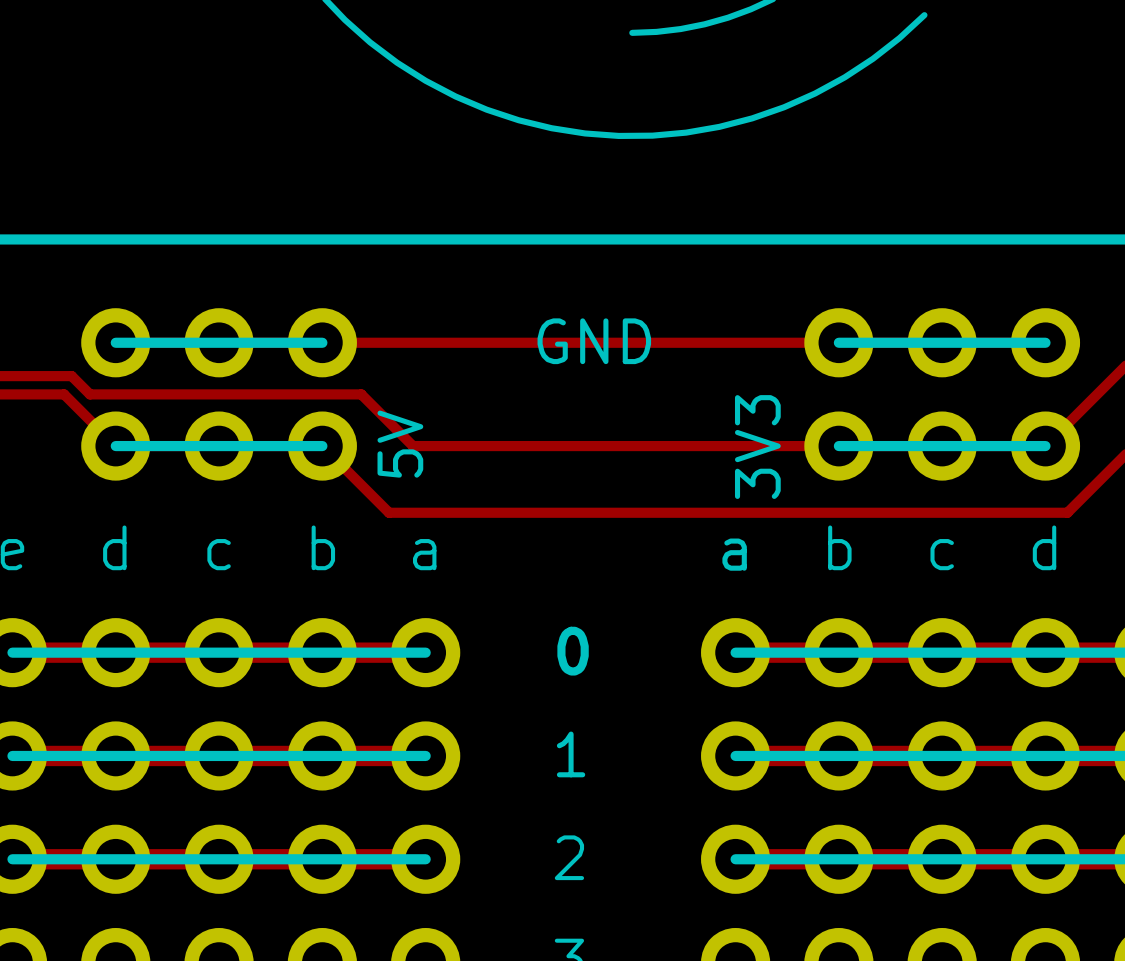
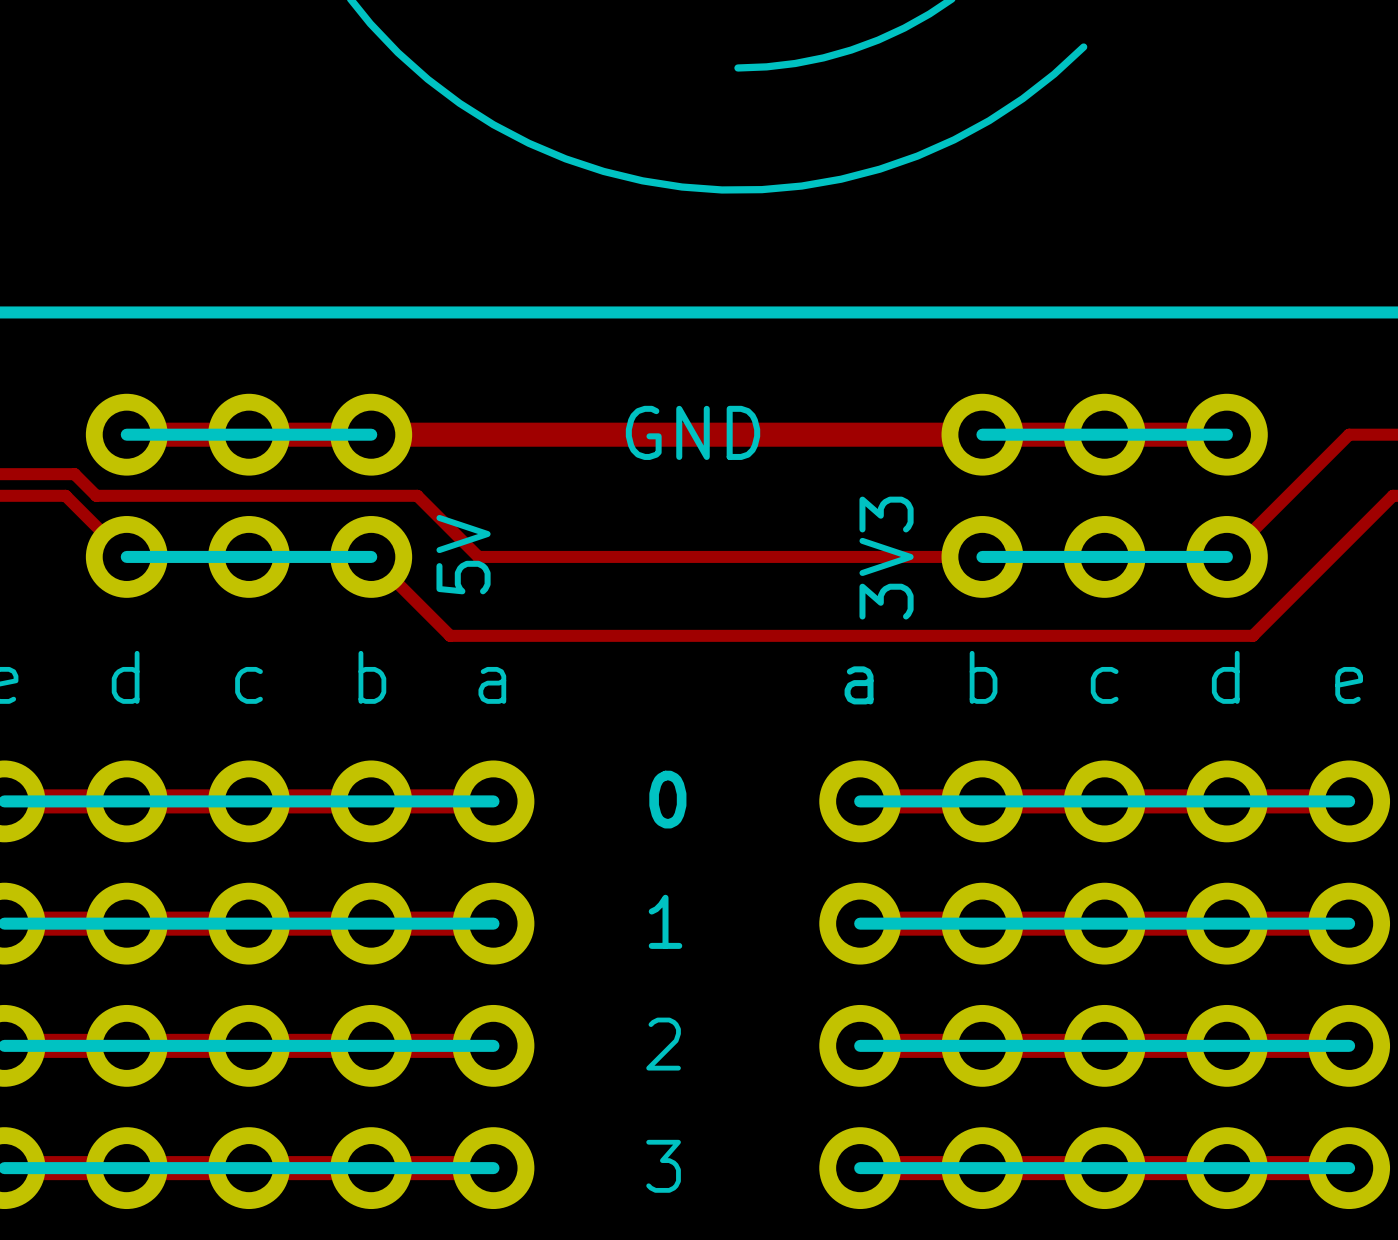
track width: thin (115, 342) (1045, 342) -> thick (126, 434) (1226, 434)

